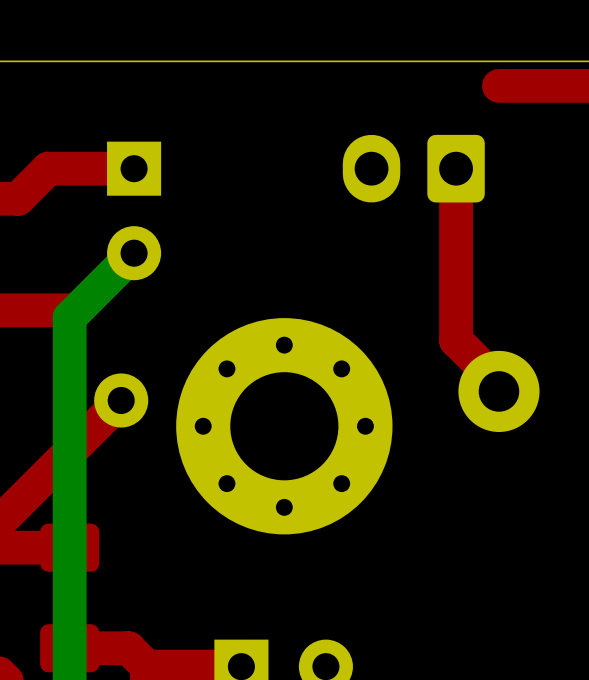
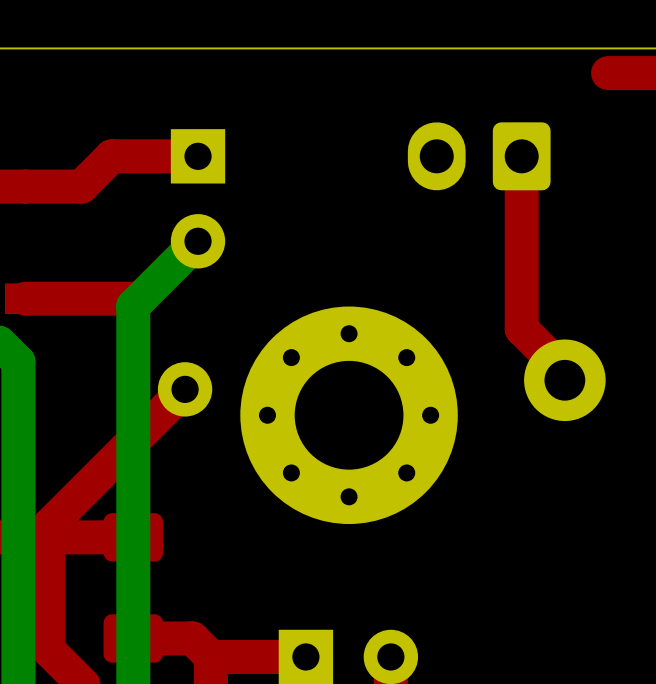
top track: (541, 85) (498, 85) -> none

